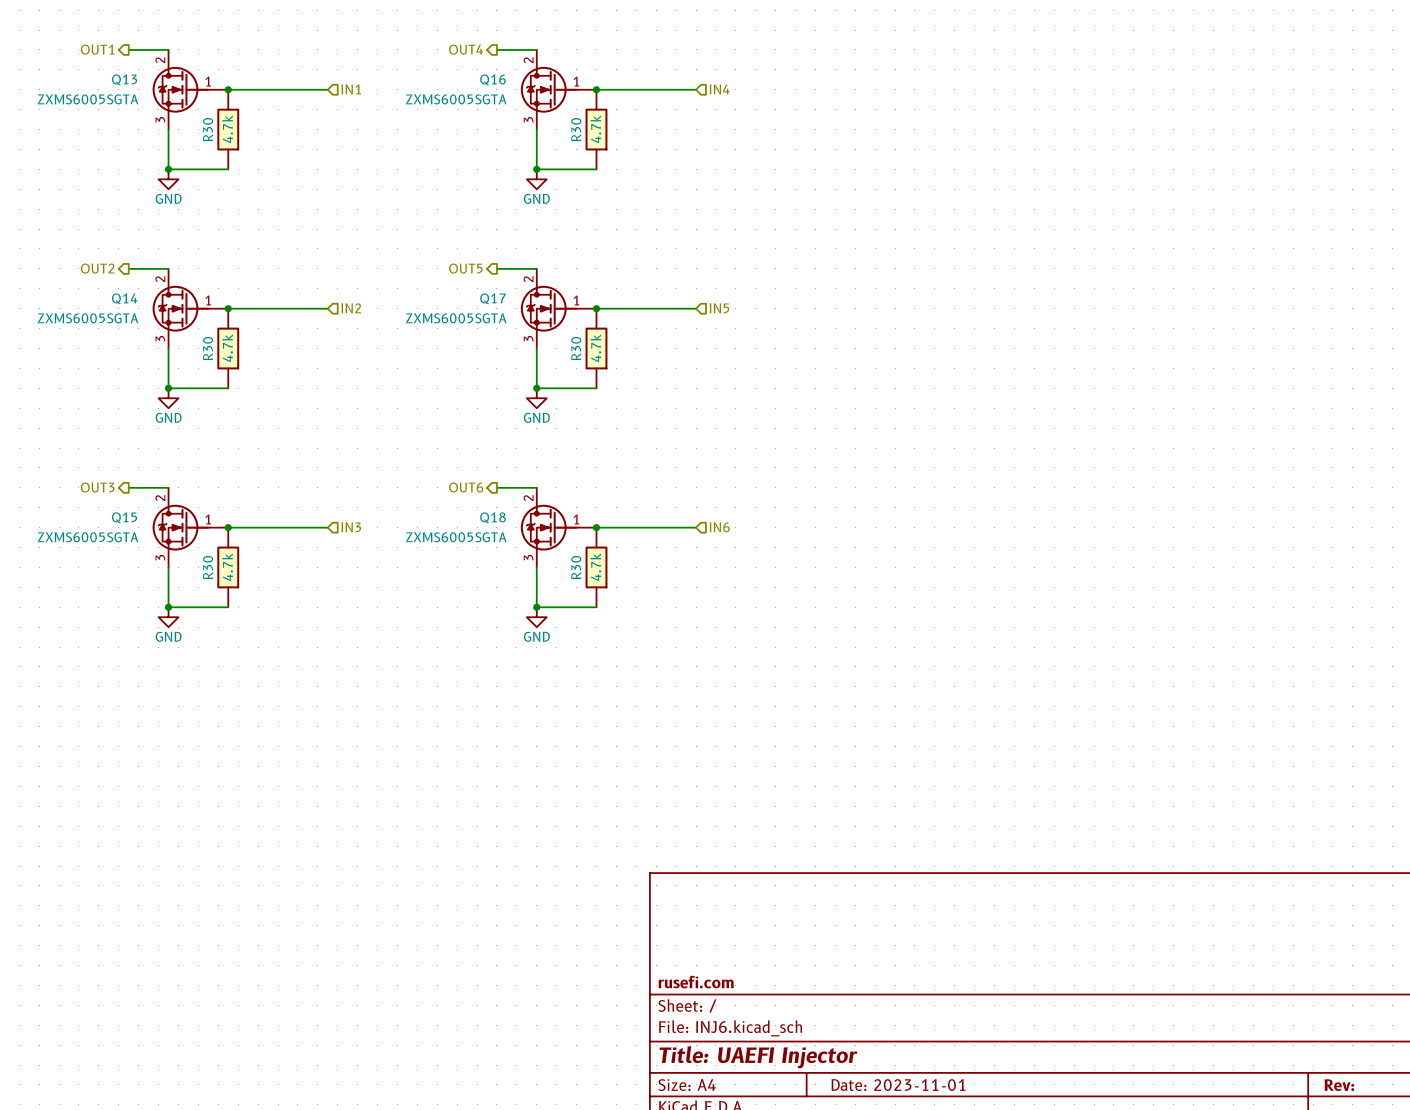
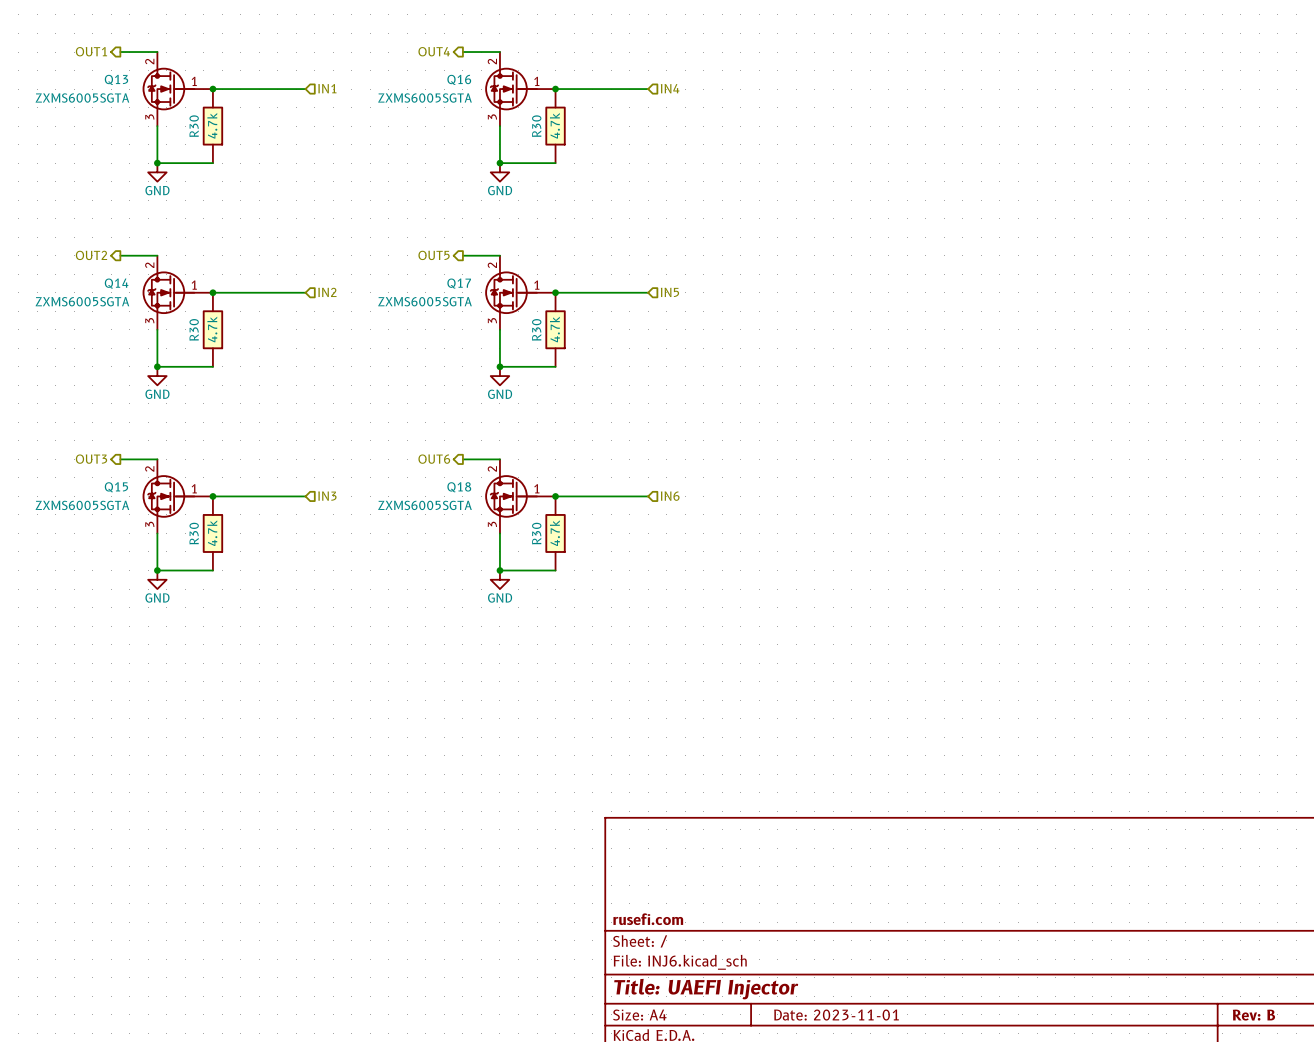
title block: Rev: (1339, 1085) -> Rev: B (1253, 1015)

